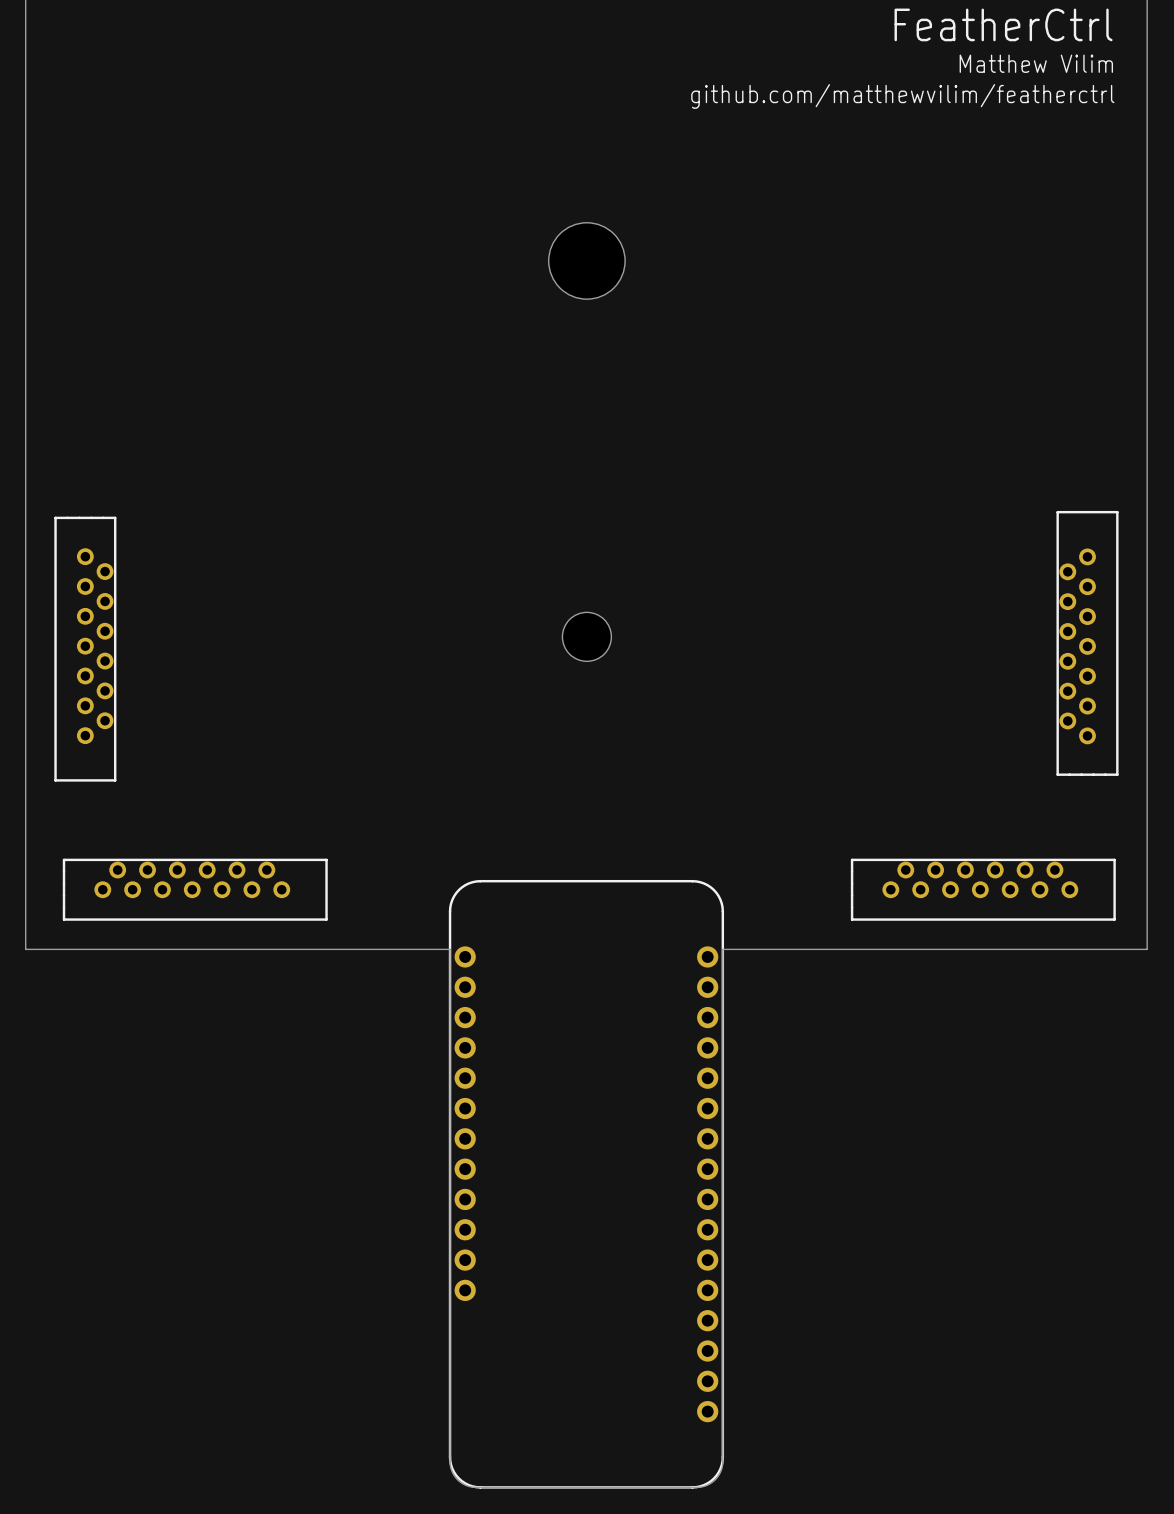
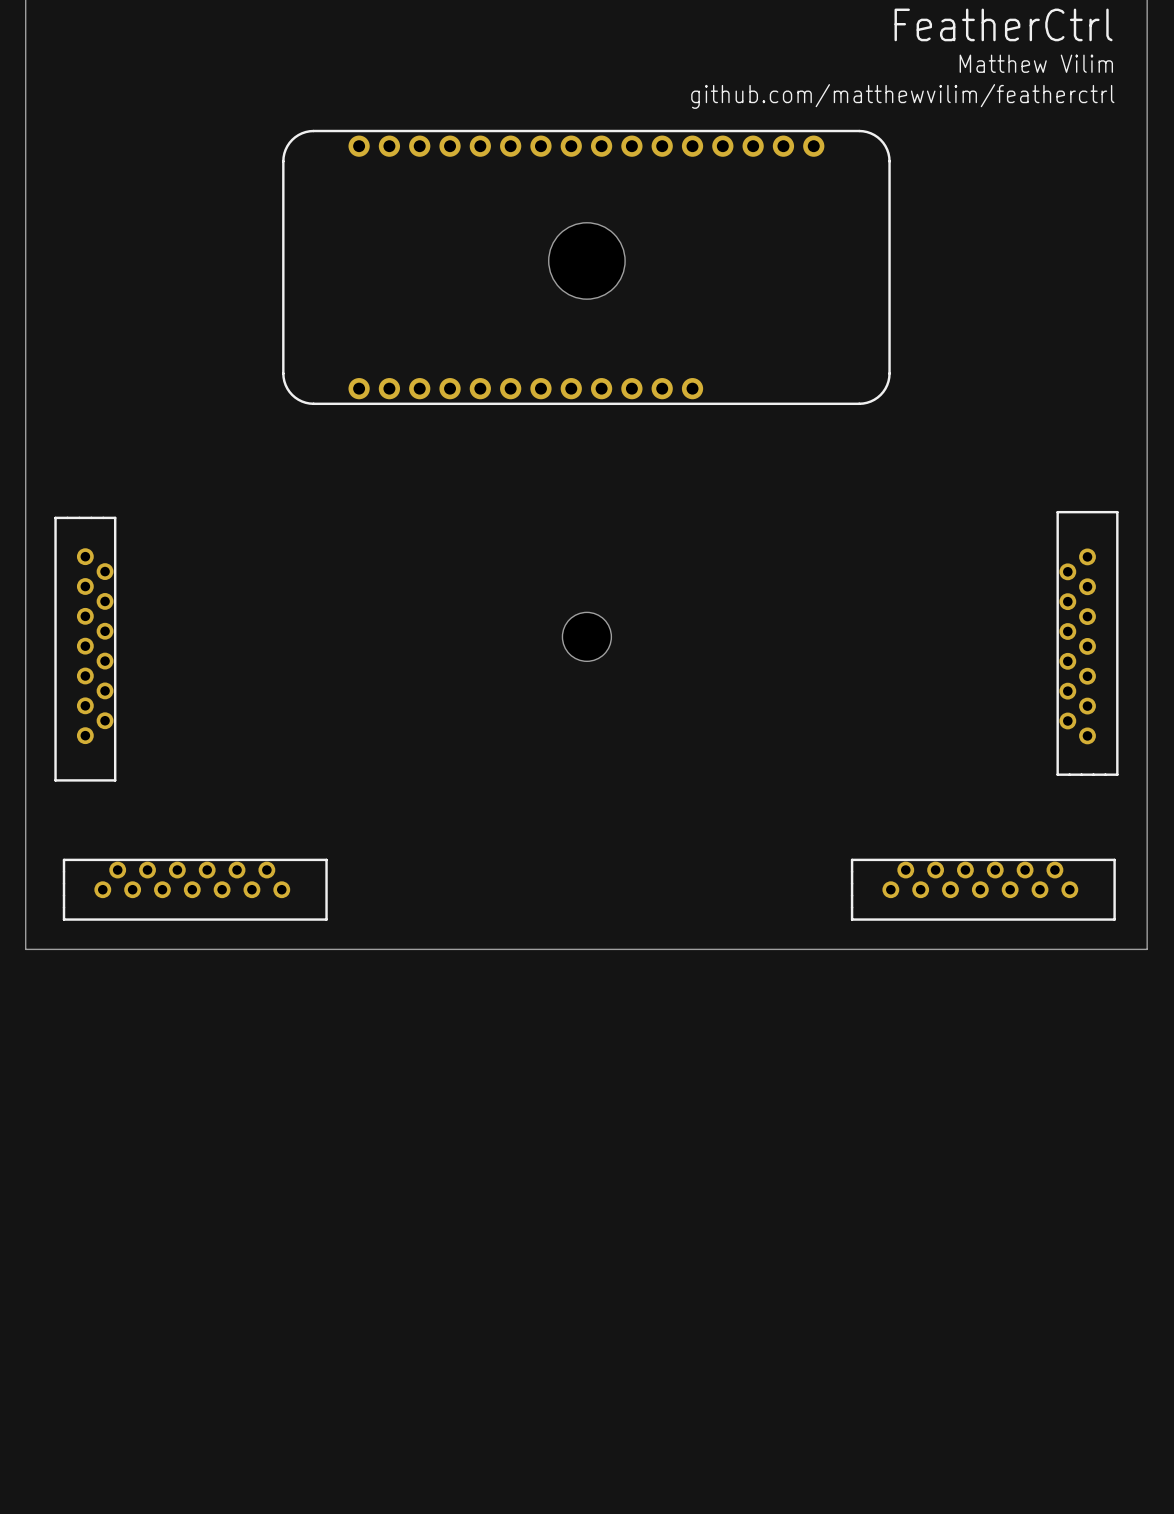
part: none -> (586, 267)
board edge: (450, 949) (450, 1461) (452, 1471) (457, 1479) (466, 1485) (475, 1487) (696, 1487) (712, 1482) (720, 1471) (722, 1461) (722, 949) -> (450, 949) (722, 949)
part: (586, 1184) -> none

